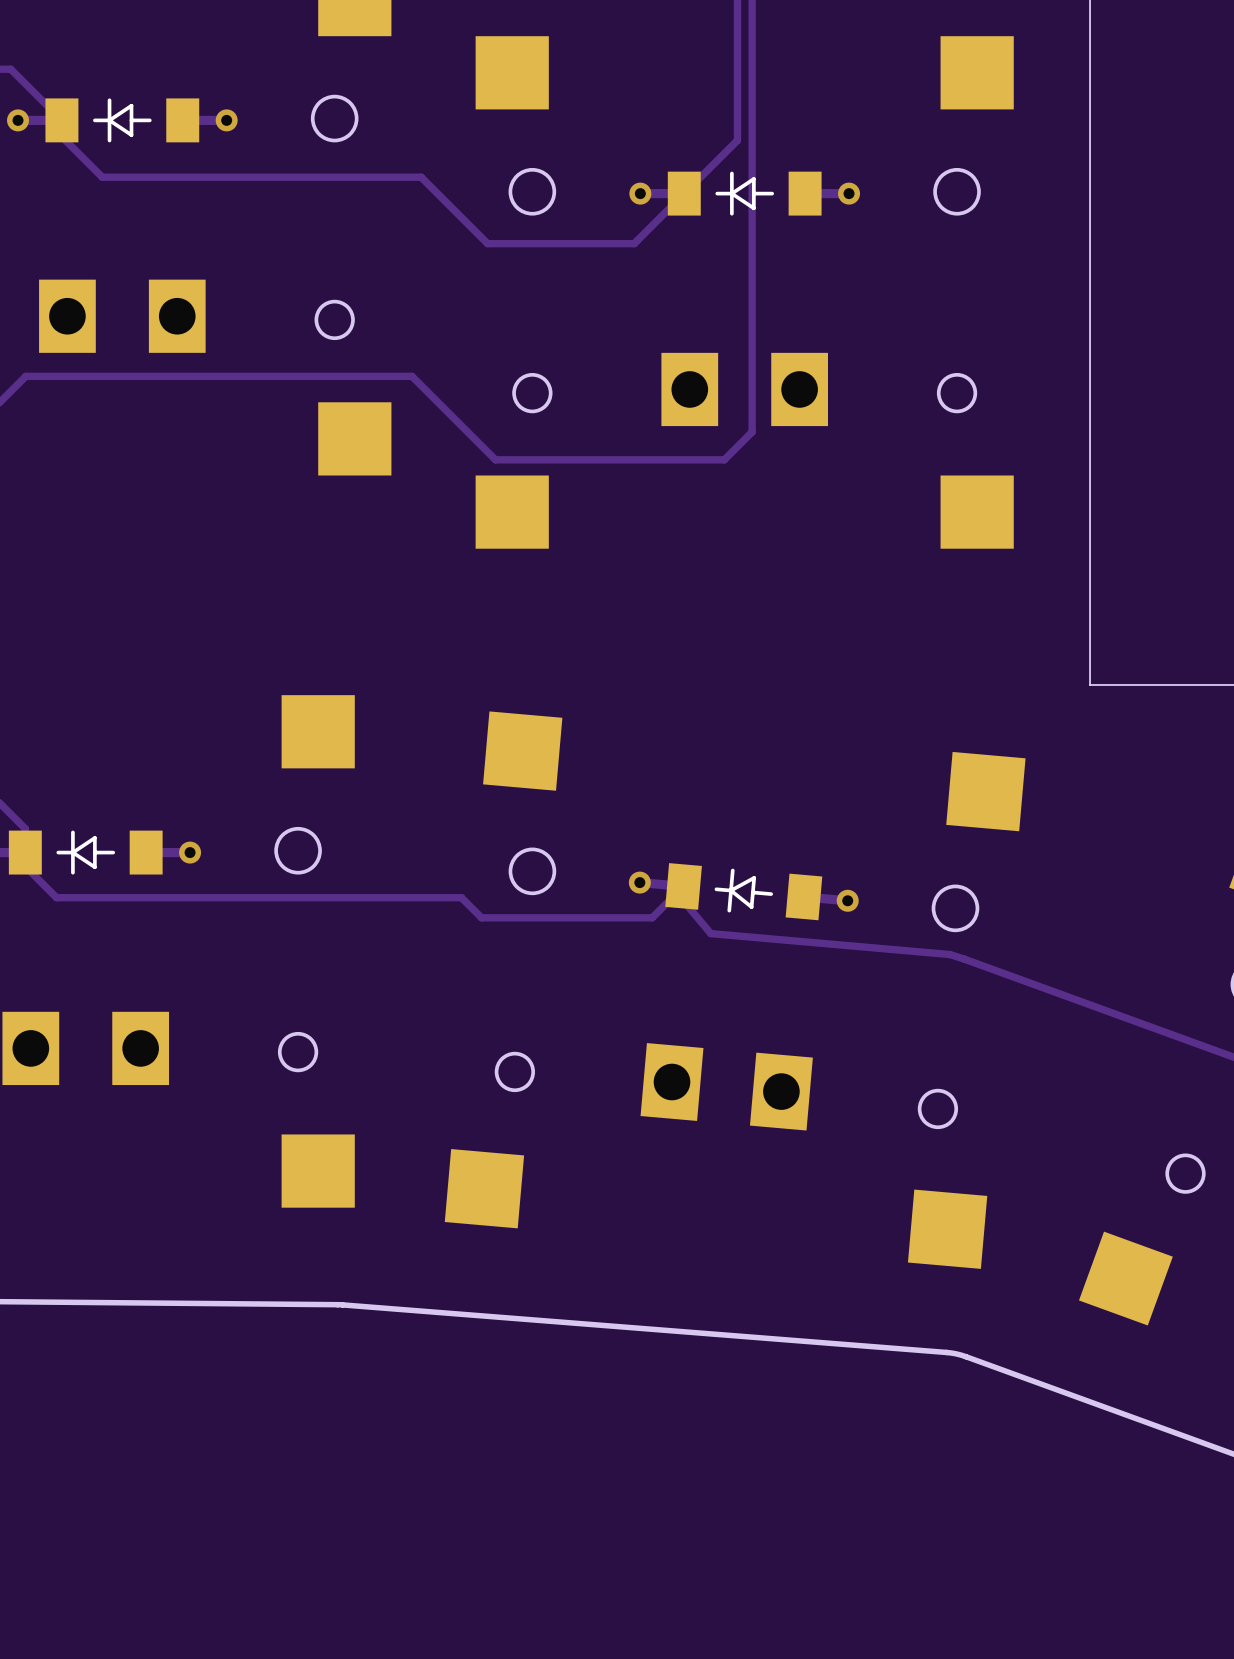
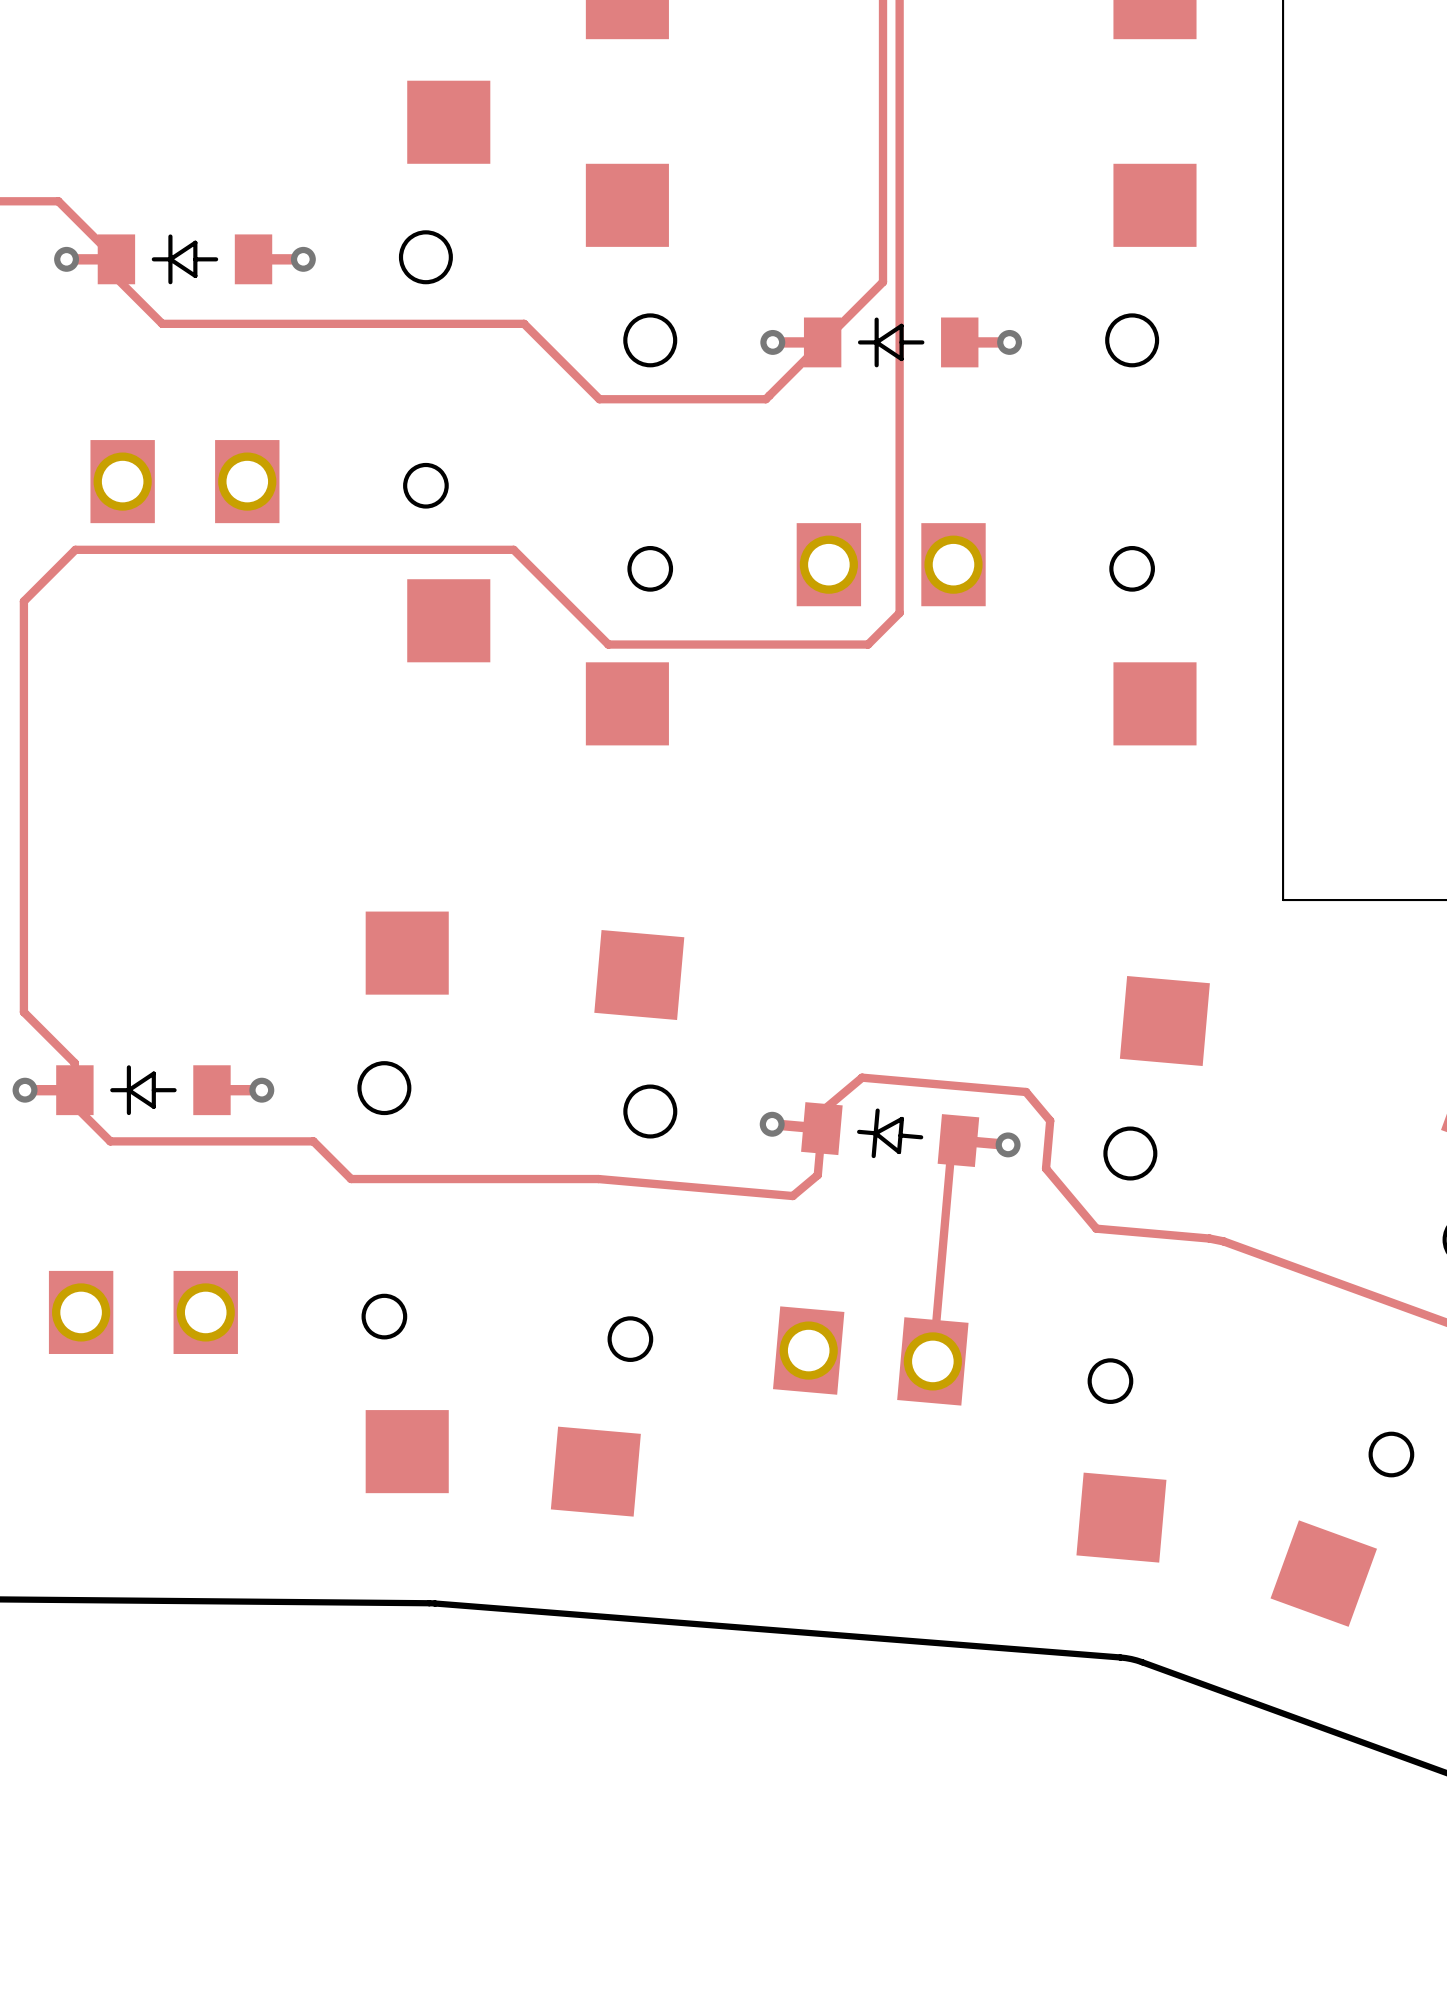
track: (683, 886) (652, 917) (481, 917) (461, 897) (235, 897) -> (820, 1143) (817, 1175) (792, 1196) (598, 1179) (351, 1179) (313, 1141)
track: none -> (958, 1140) (951, 1146) (932, 1361)
track: (682, 899) (710, 933) (949, 954) (1037, 985) -> (821, 1128) (823, 1110) (862, 1077) (1026, 1091) (1050, 1120) (1046, 1168) (1096, 1228) (1223, 1241)

